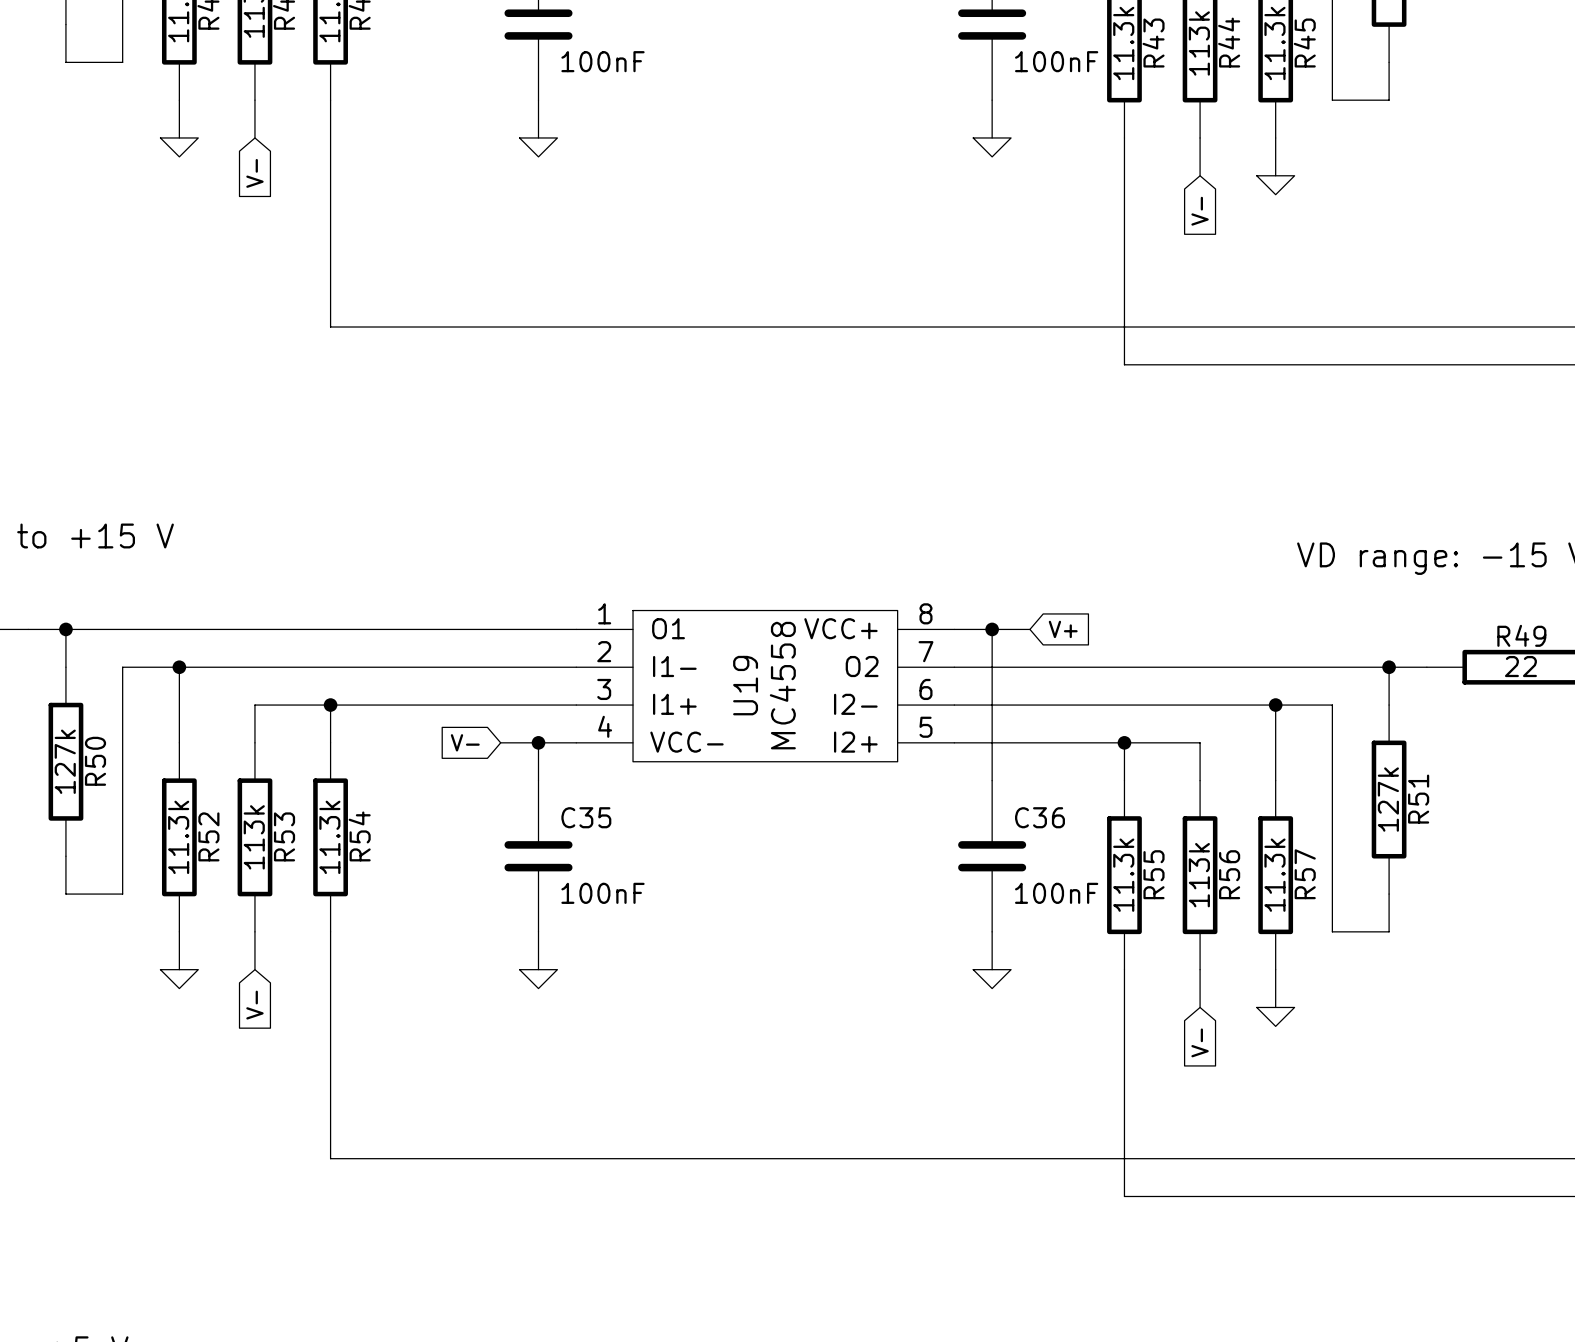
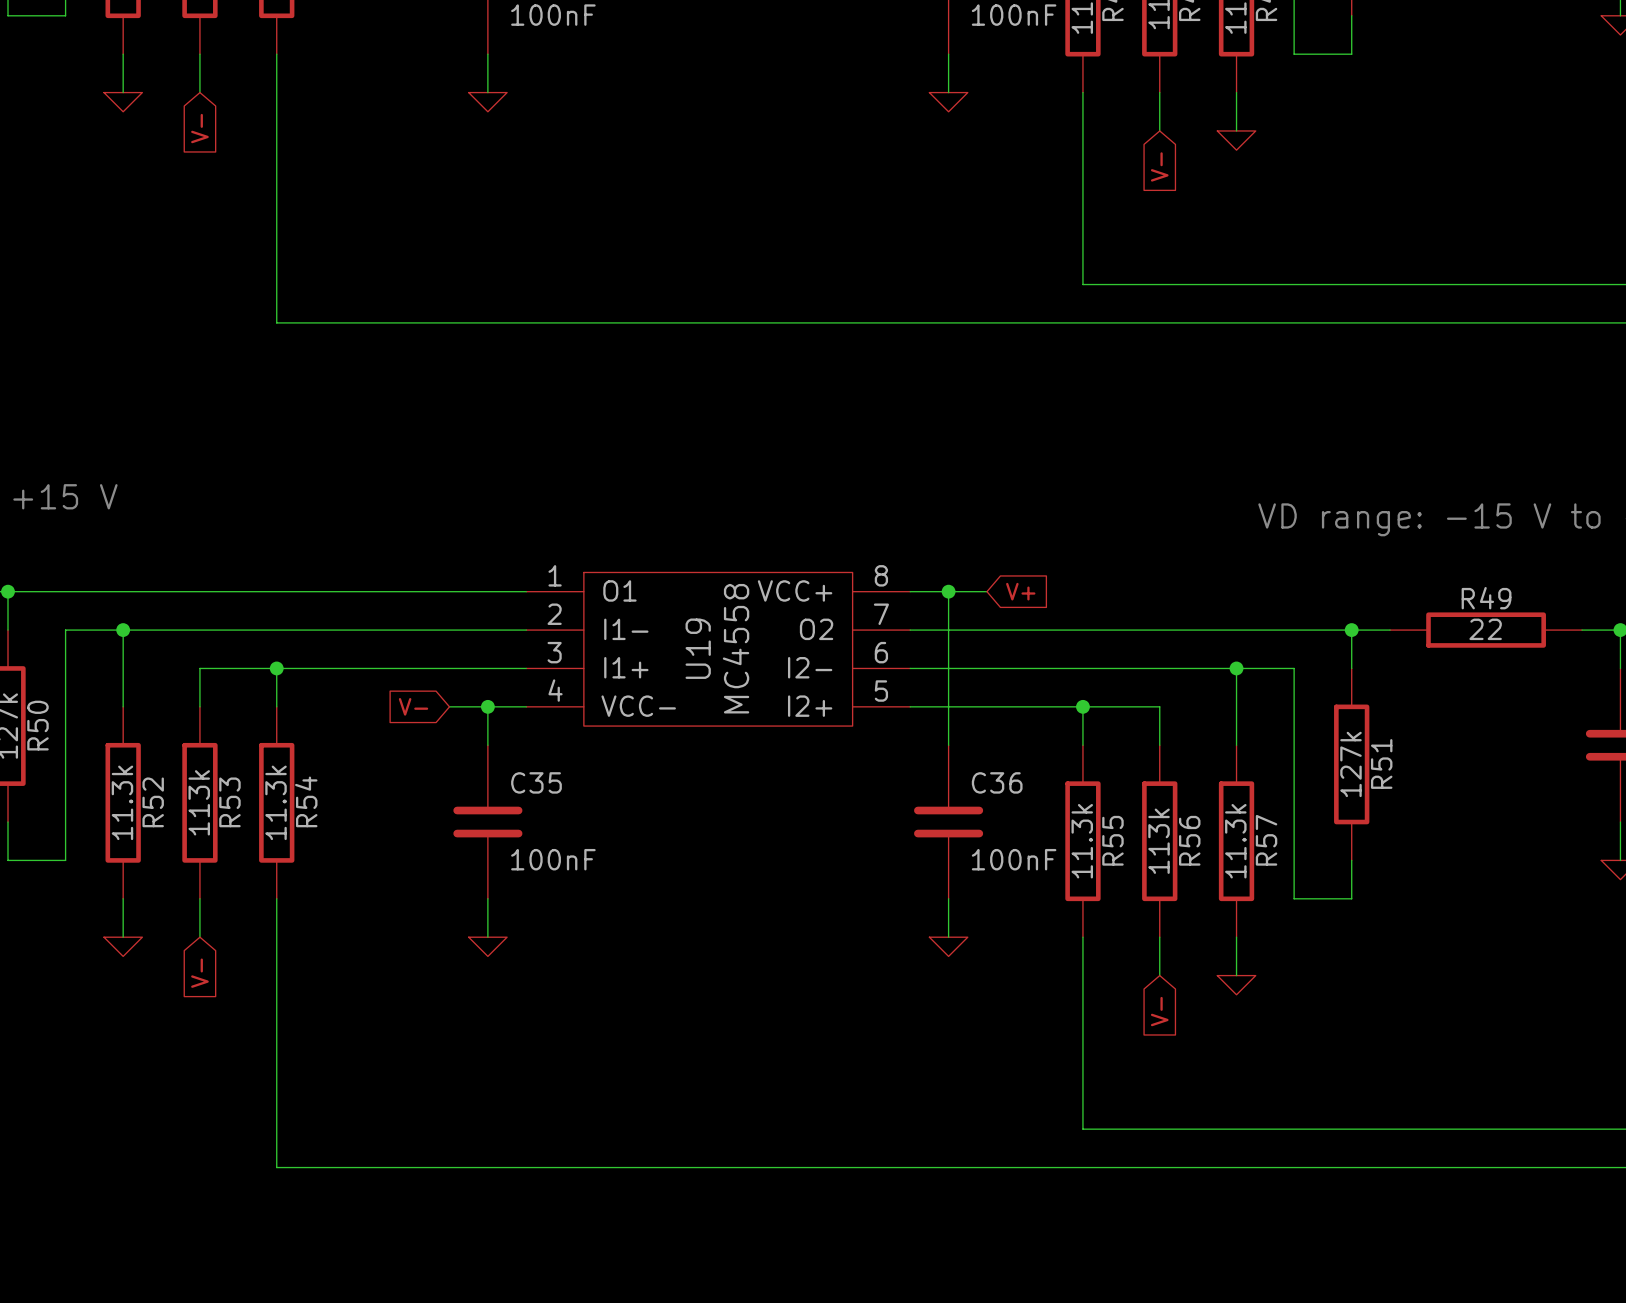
wire: (330, 327) (1124, 327) (1124, 364) -> (276, 284) (276, 322) (1082, 322)
wire: (330, 1158) (1124, 1158) (1124, 1196) -> (276, 1129) (276, 1167) (1082, 1167)

